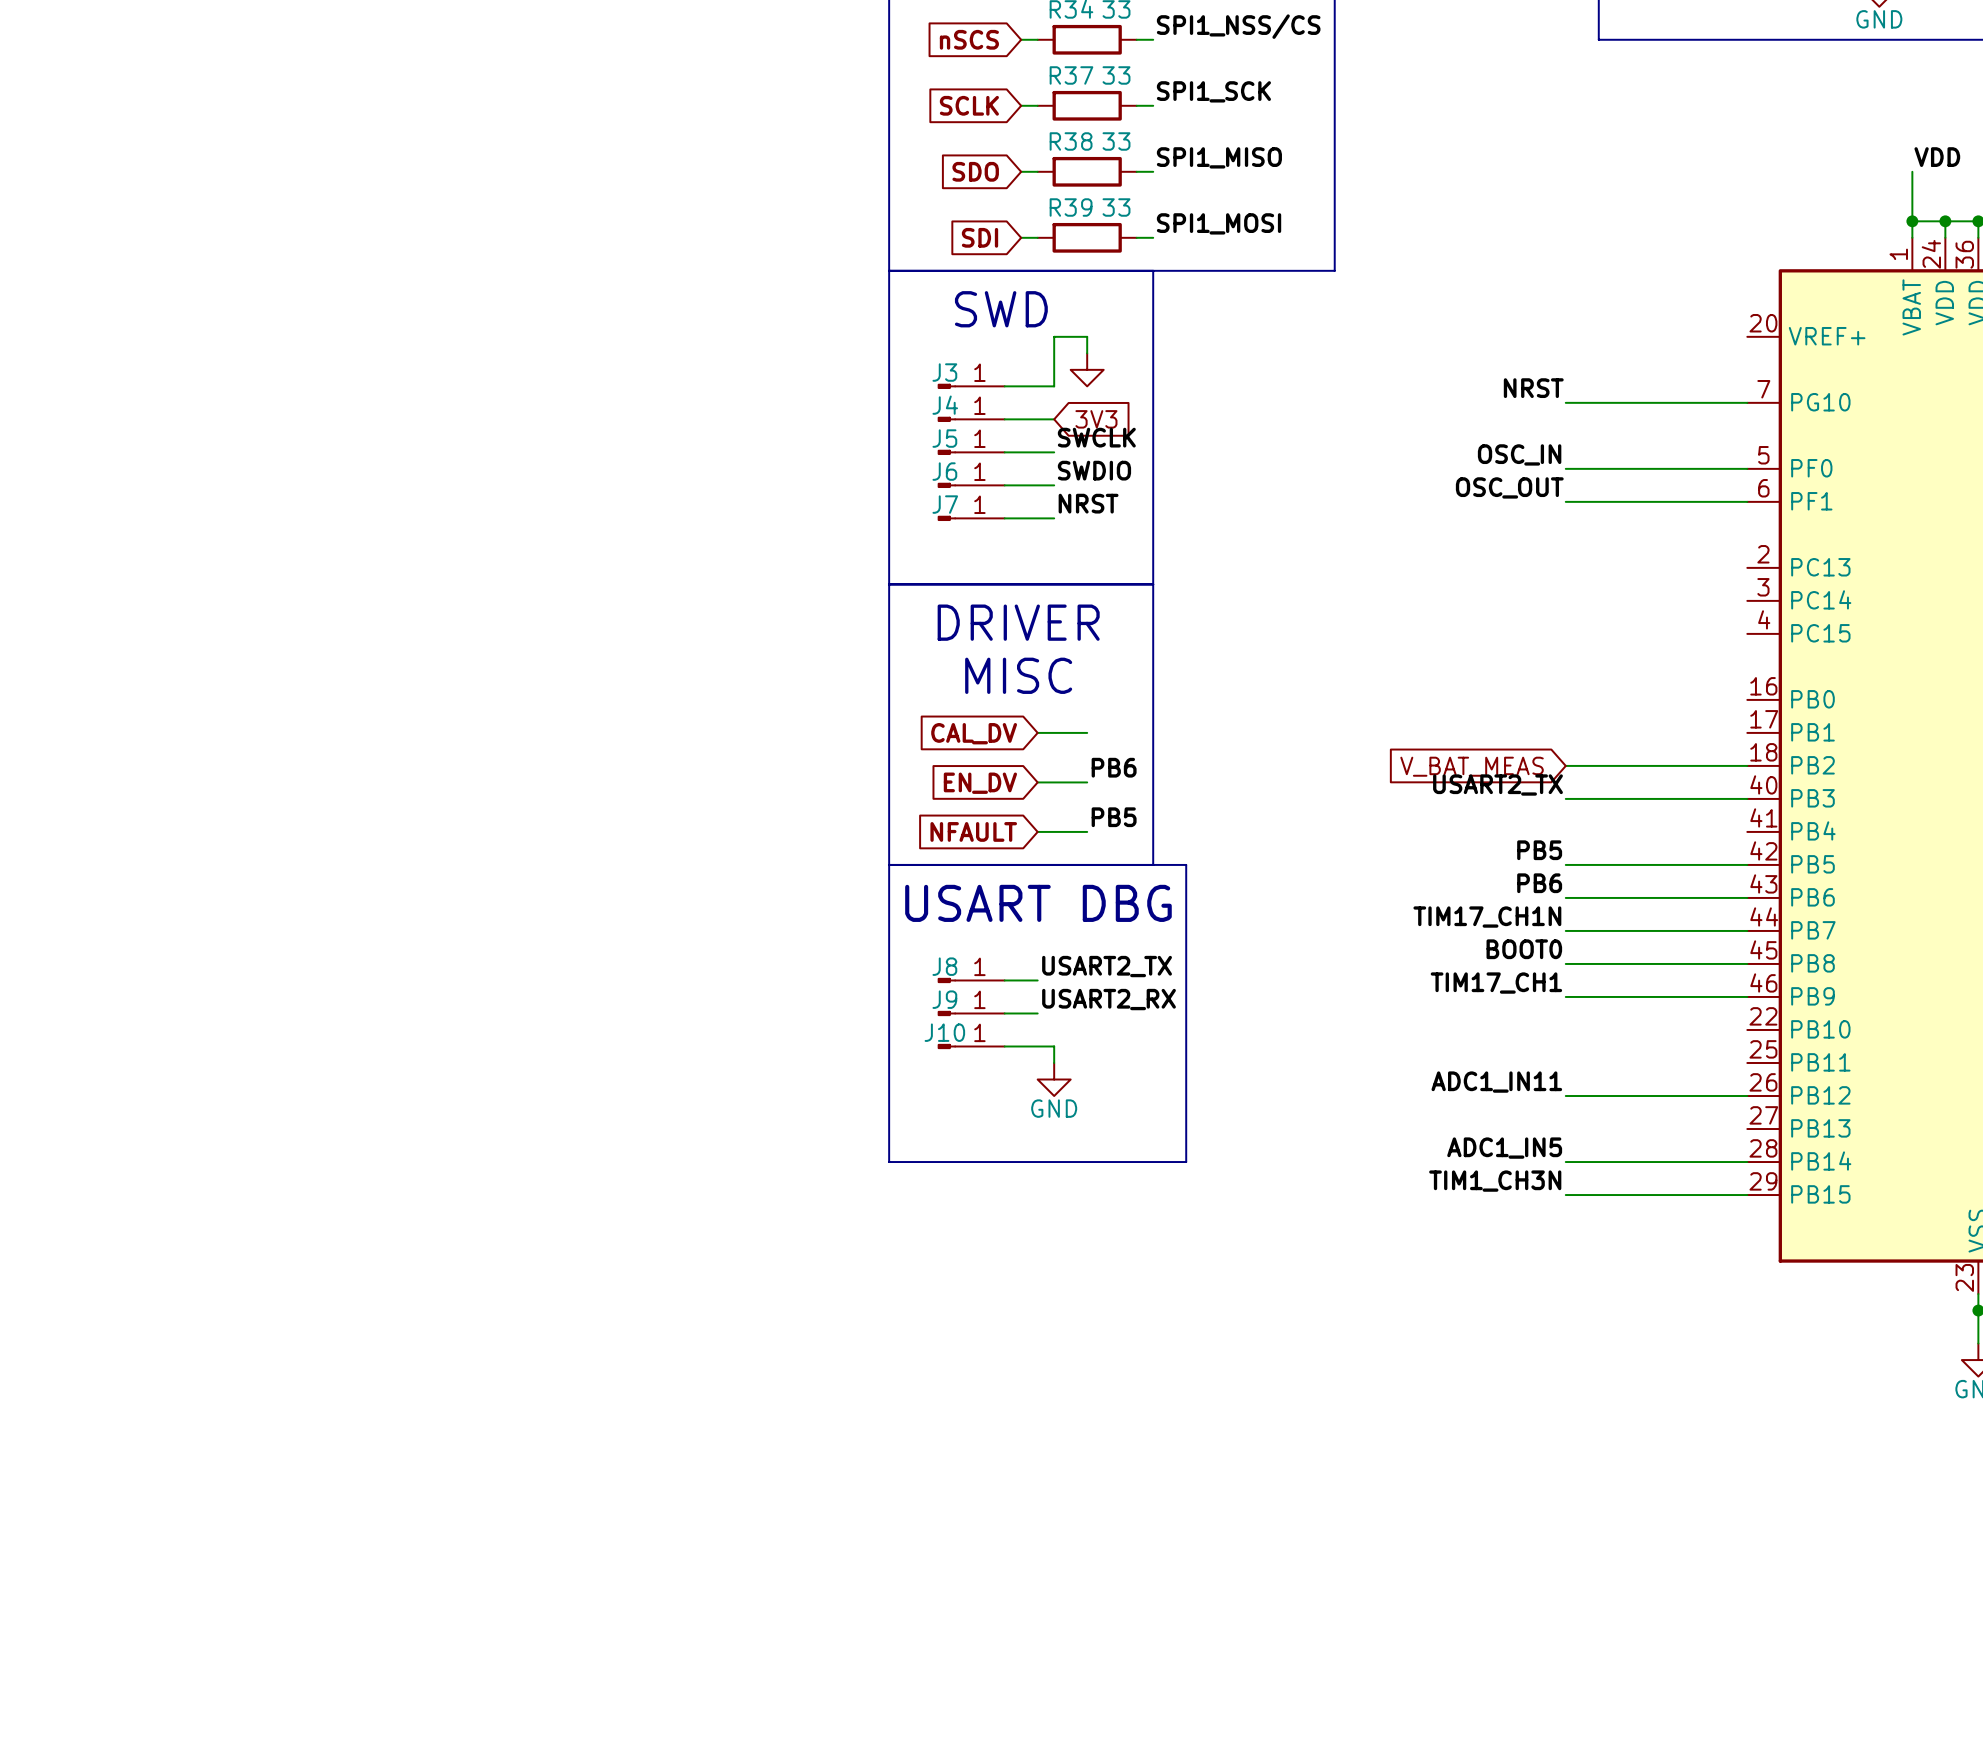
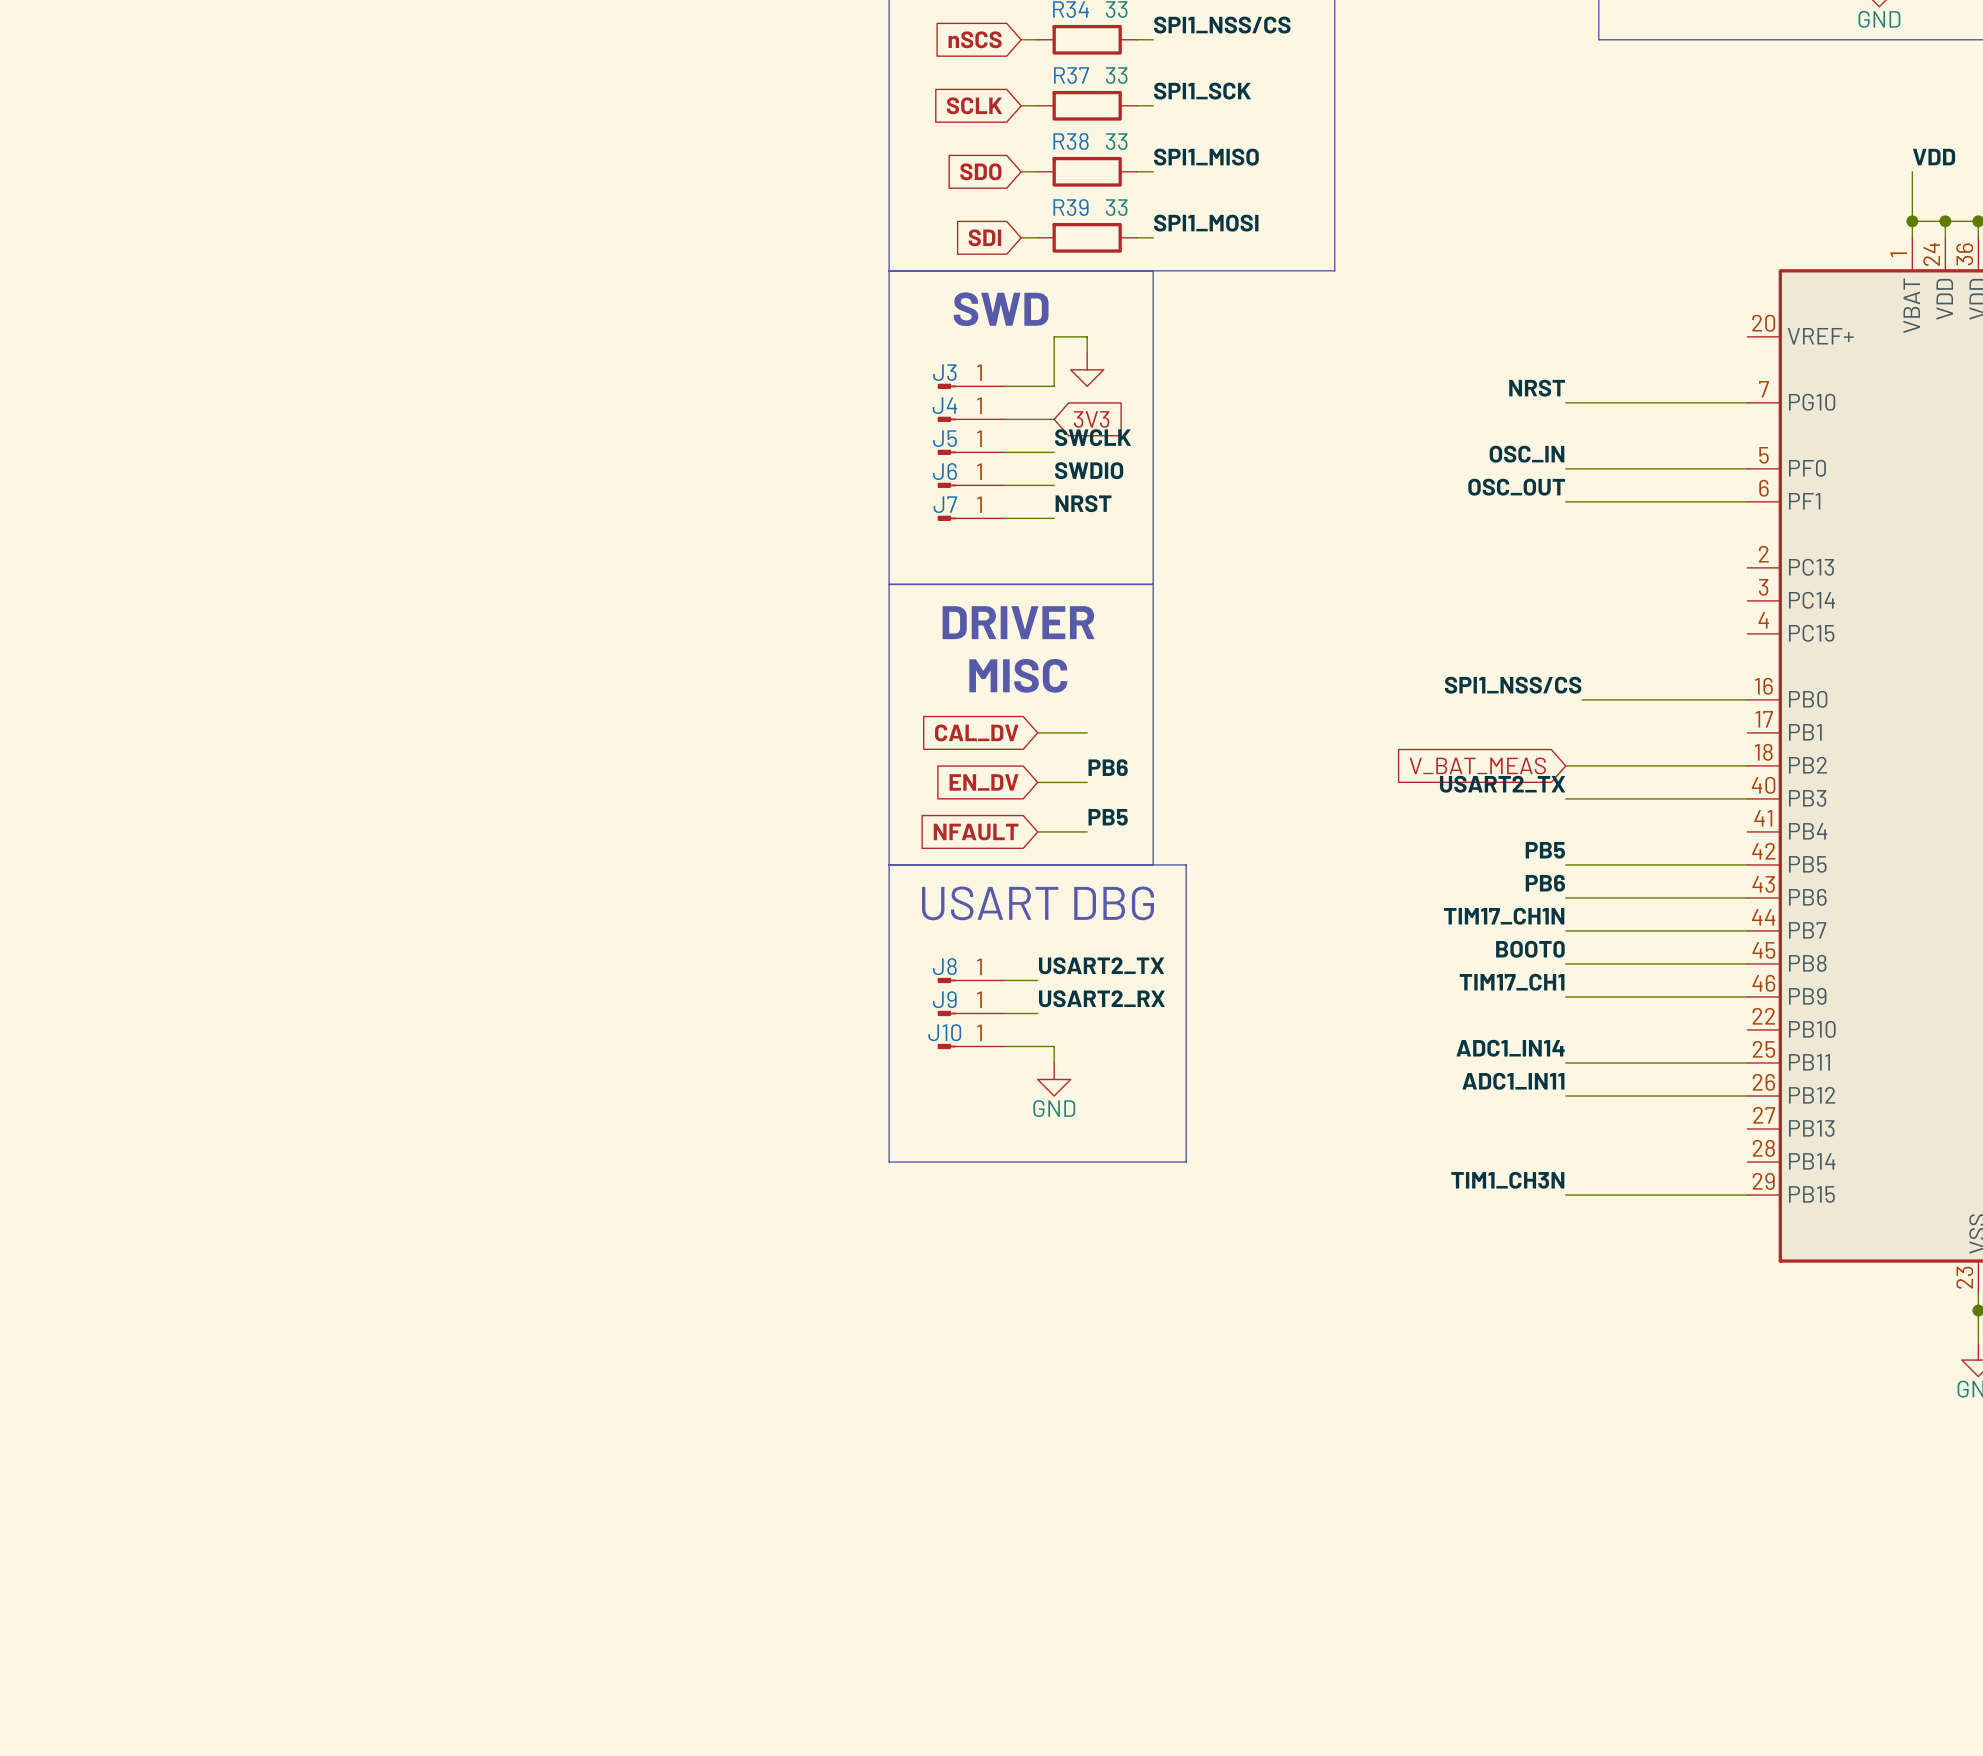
label: none -> SPI1_NSS/CS (1513, 685)
wire: none -> (1582, 699) (1747, 699)
label: none -> ADC1_IN14 (1510, 1048)
label: ADC1_IN5 (1504, 1148) -> none
wire: (1565, 1162) (1747, 1162) -> (1565, 1062) (1747, 1062)

